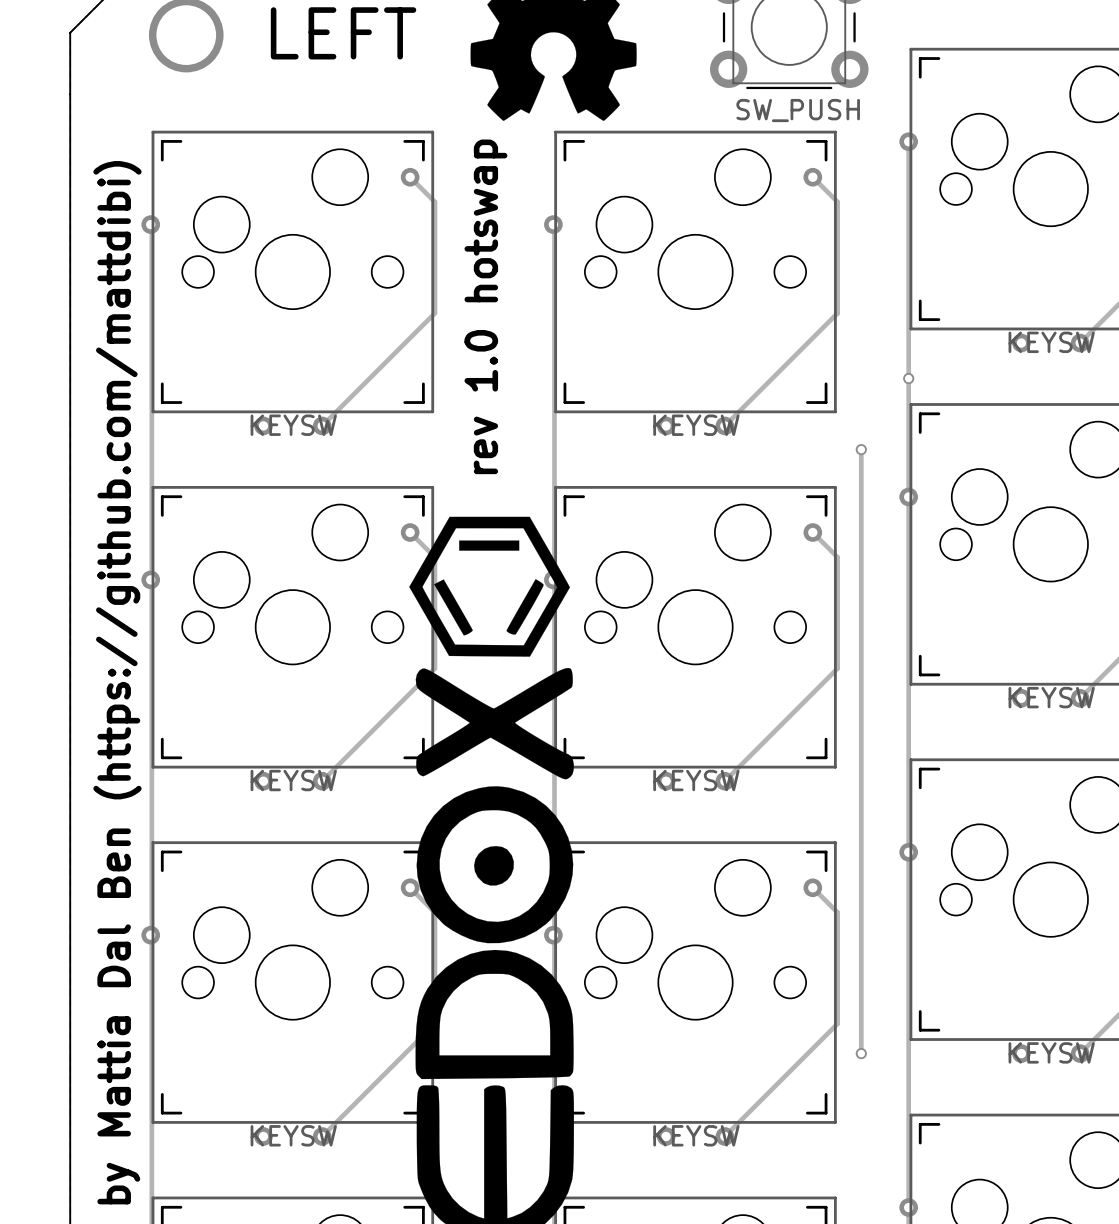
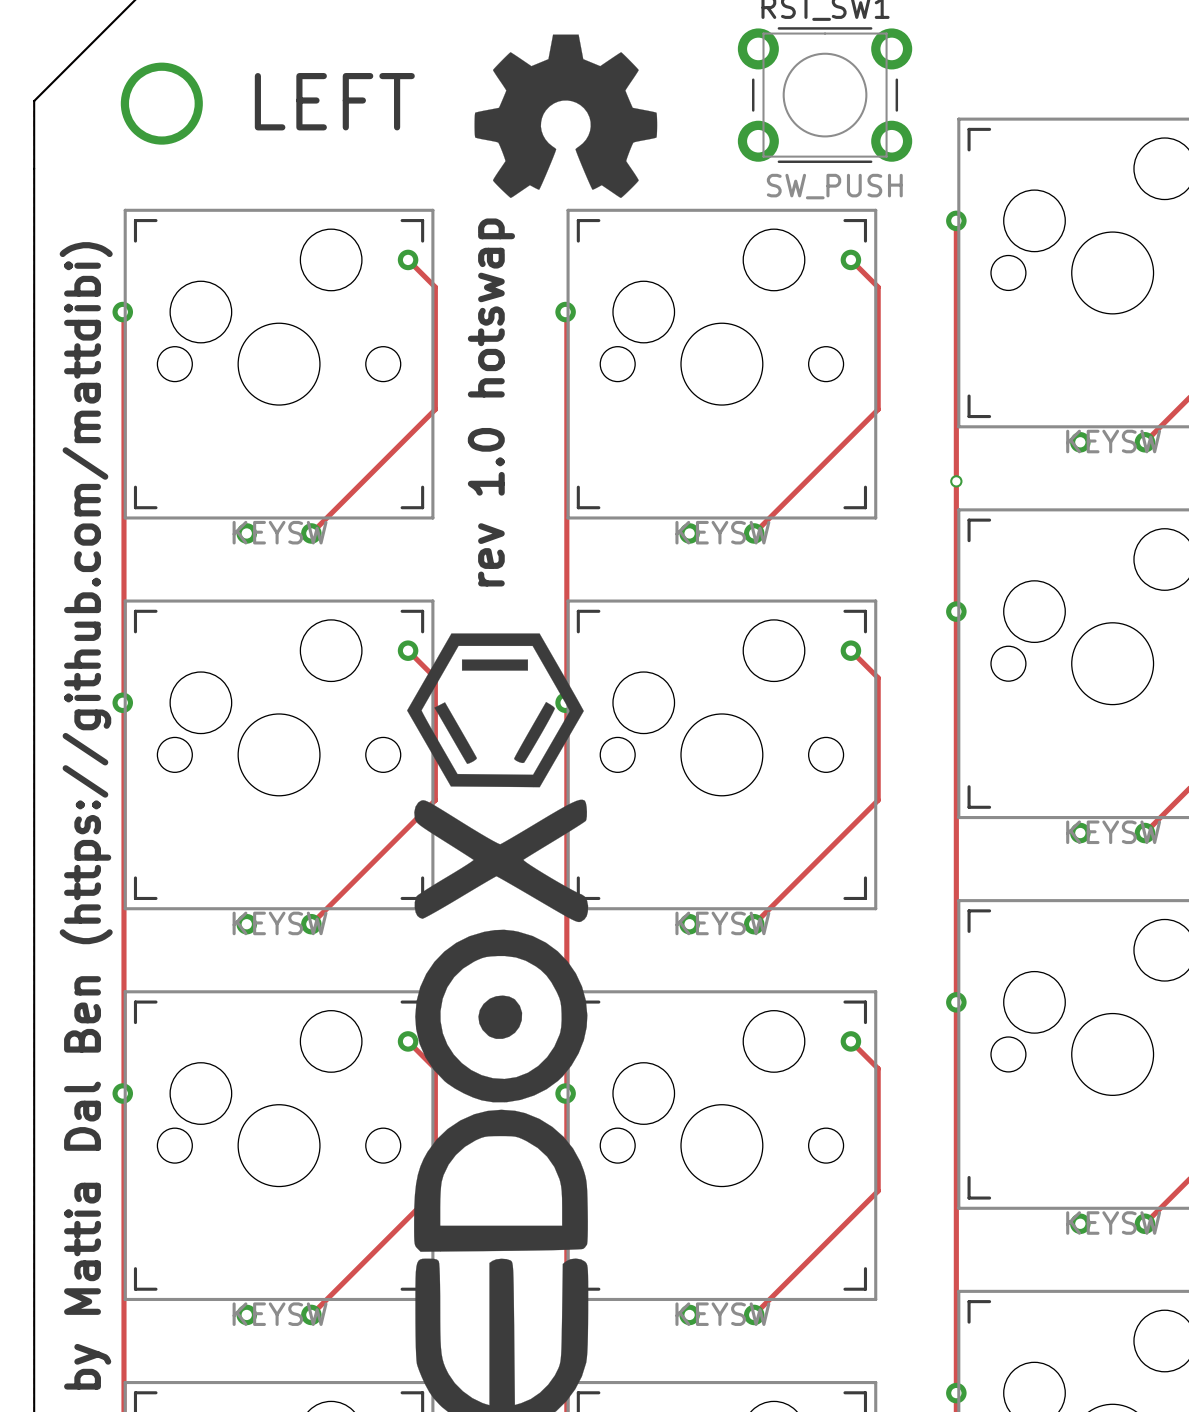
track: (861, 449) (861, 1053) -> none
via: (861, 449) -> none
via: (861, 1053) -> none

